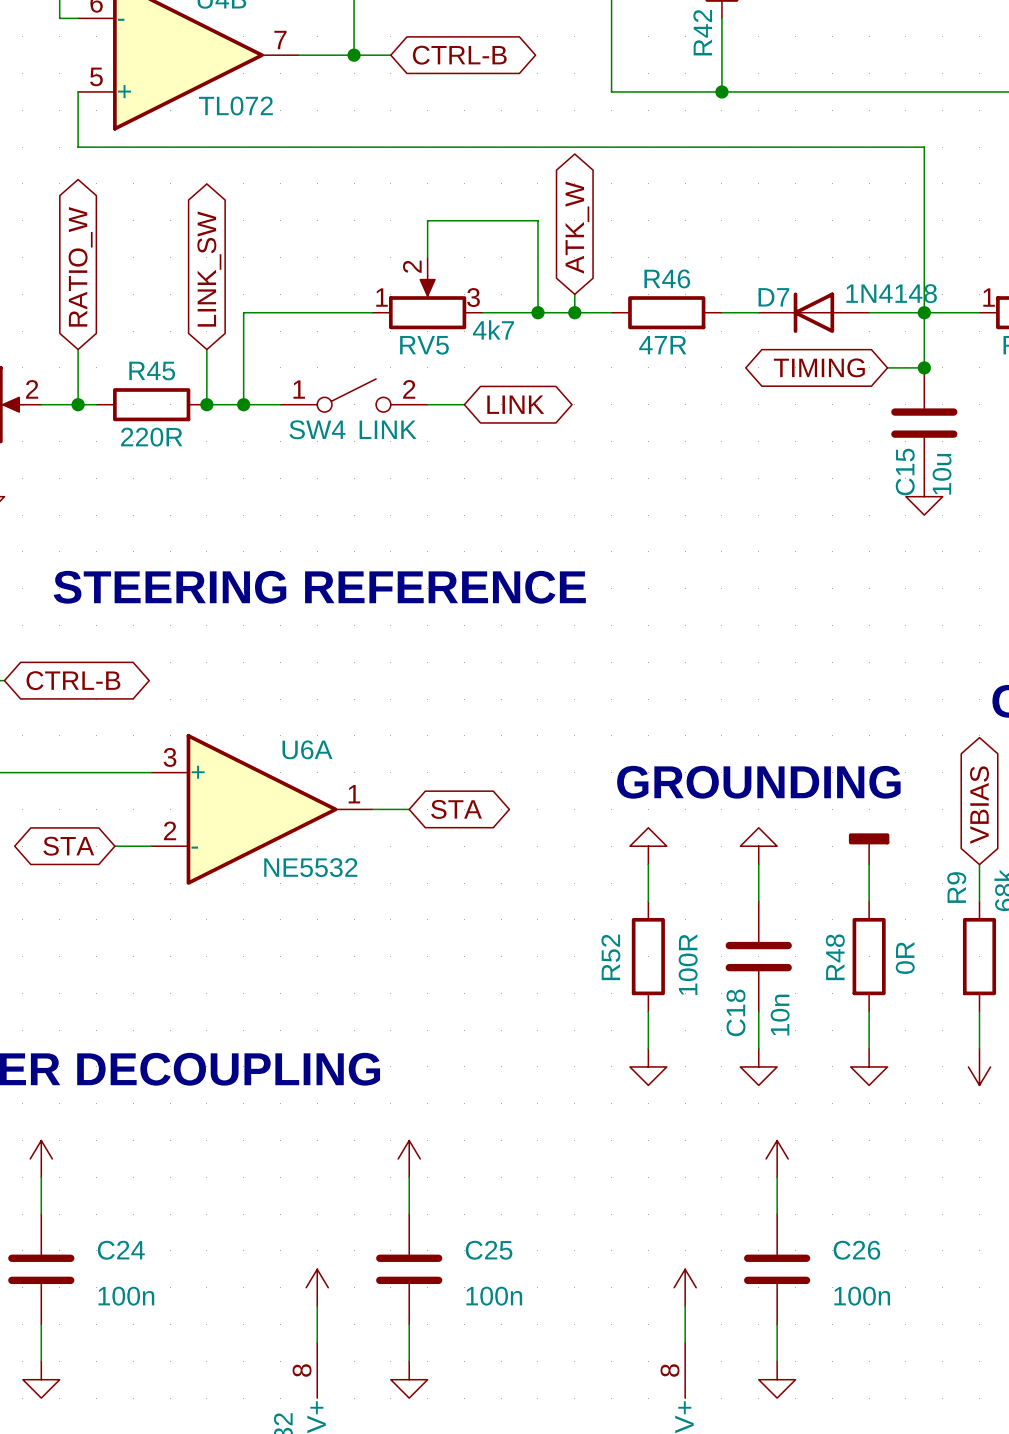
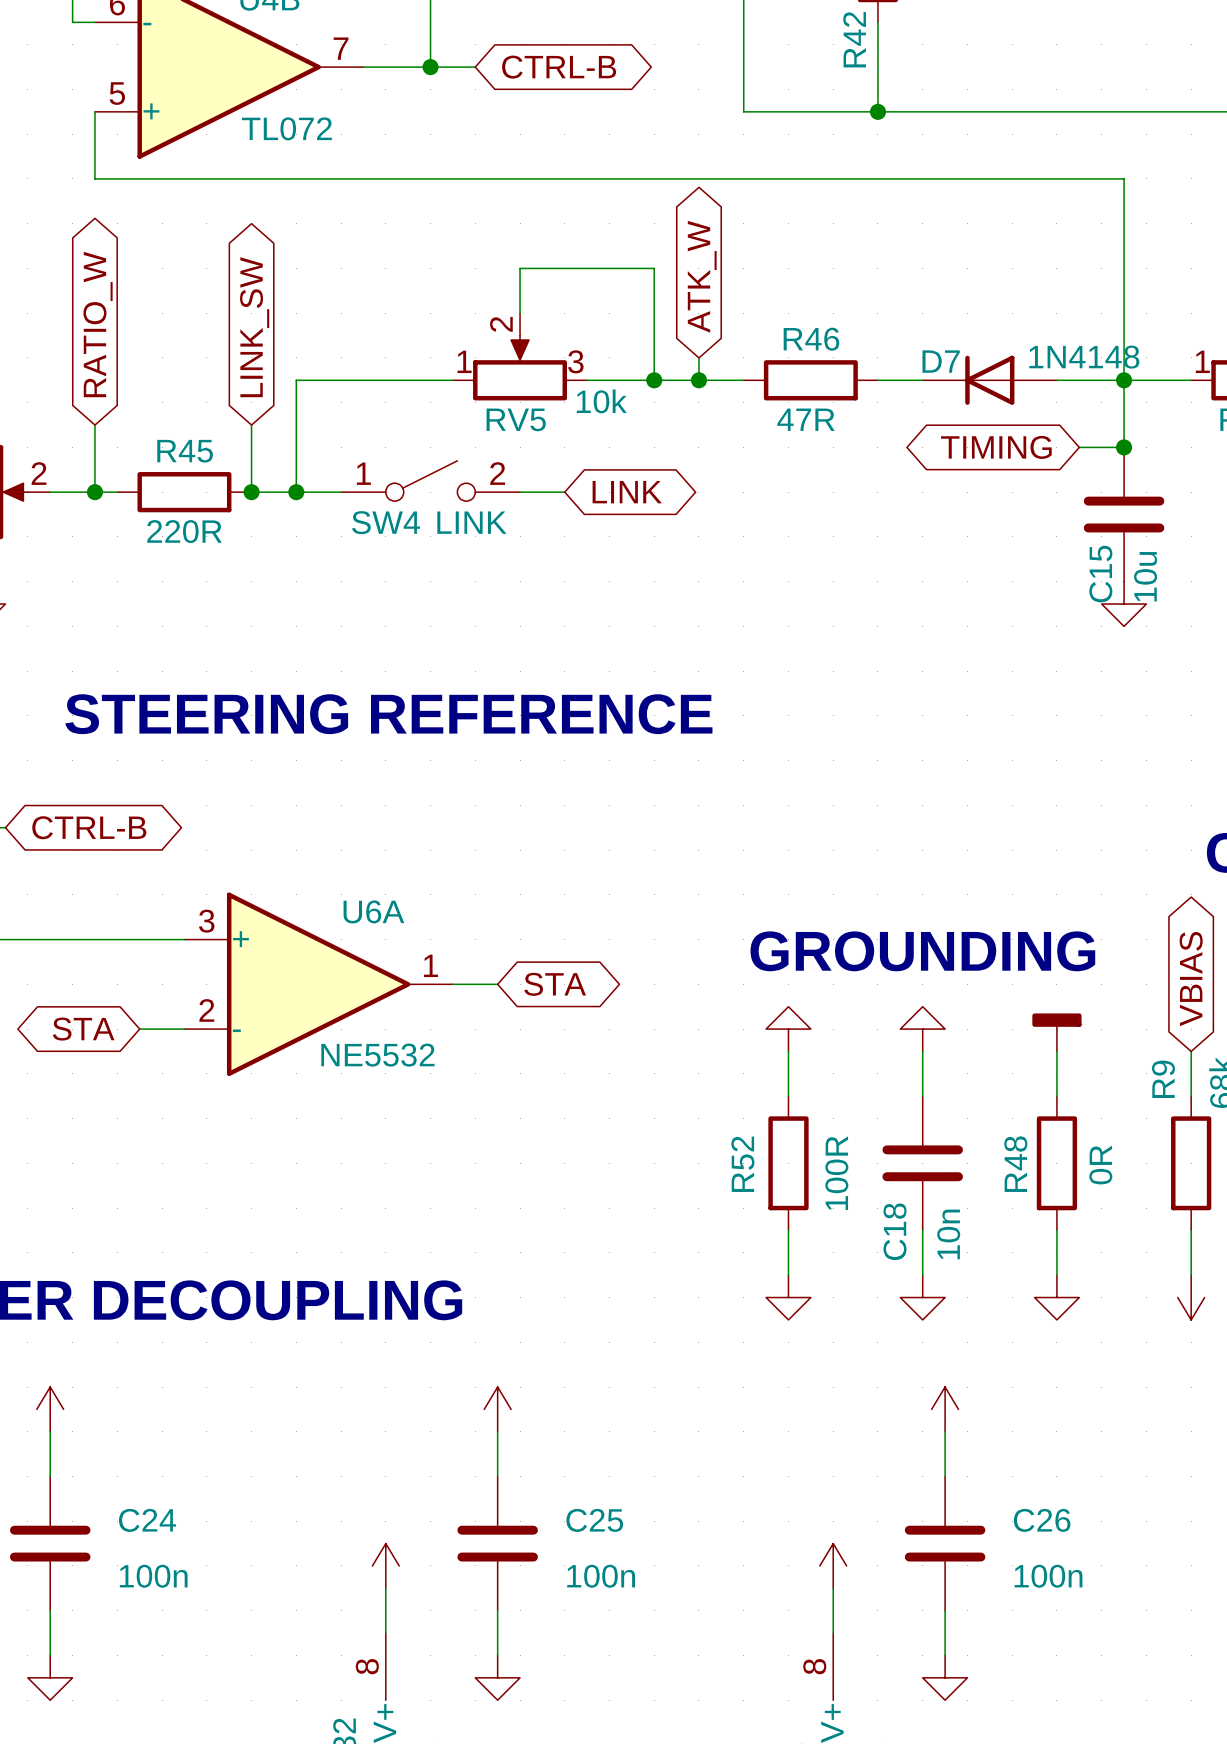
RV5 value: 4k7 (493, 329) -> 10k (601, 401)

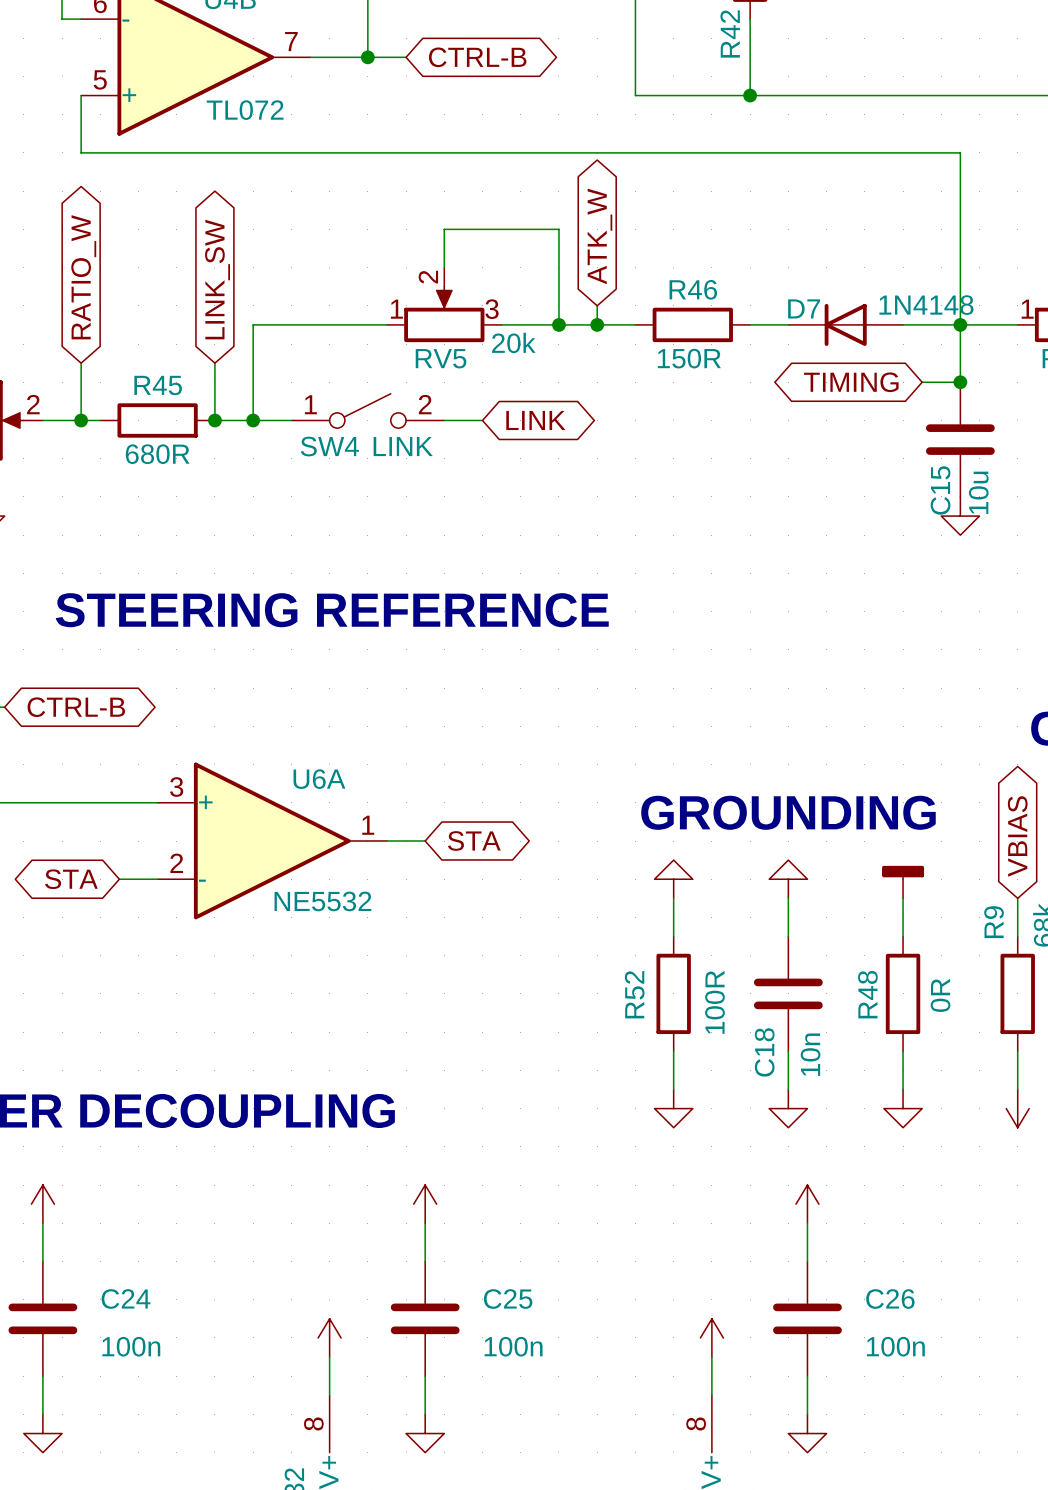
RV5 value: 10k (601, 401) -> 20k (513, 342)
R46 value: 47R (806, 419) -> 150R (689, 358)
R45 value: 220R (184, 531) -> 680R (157, 454)

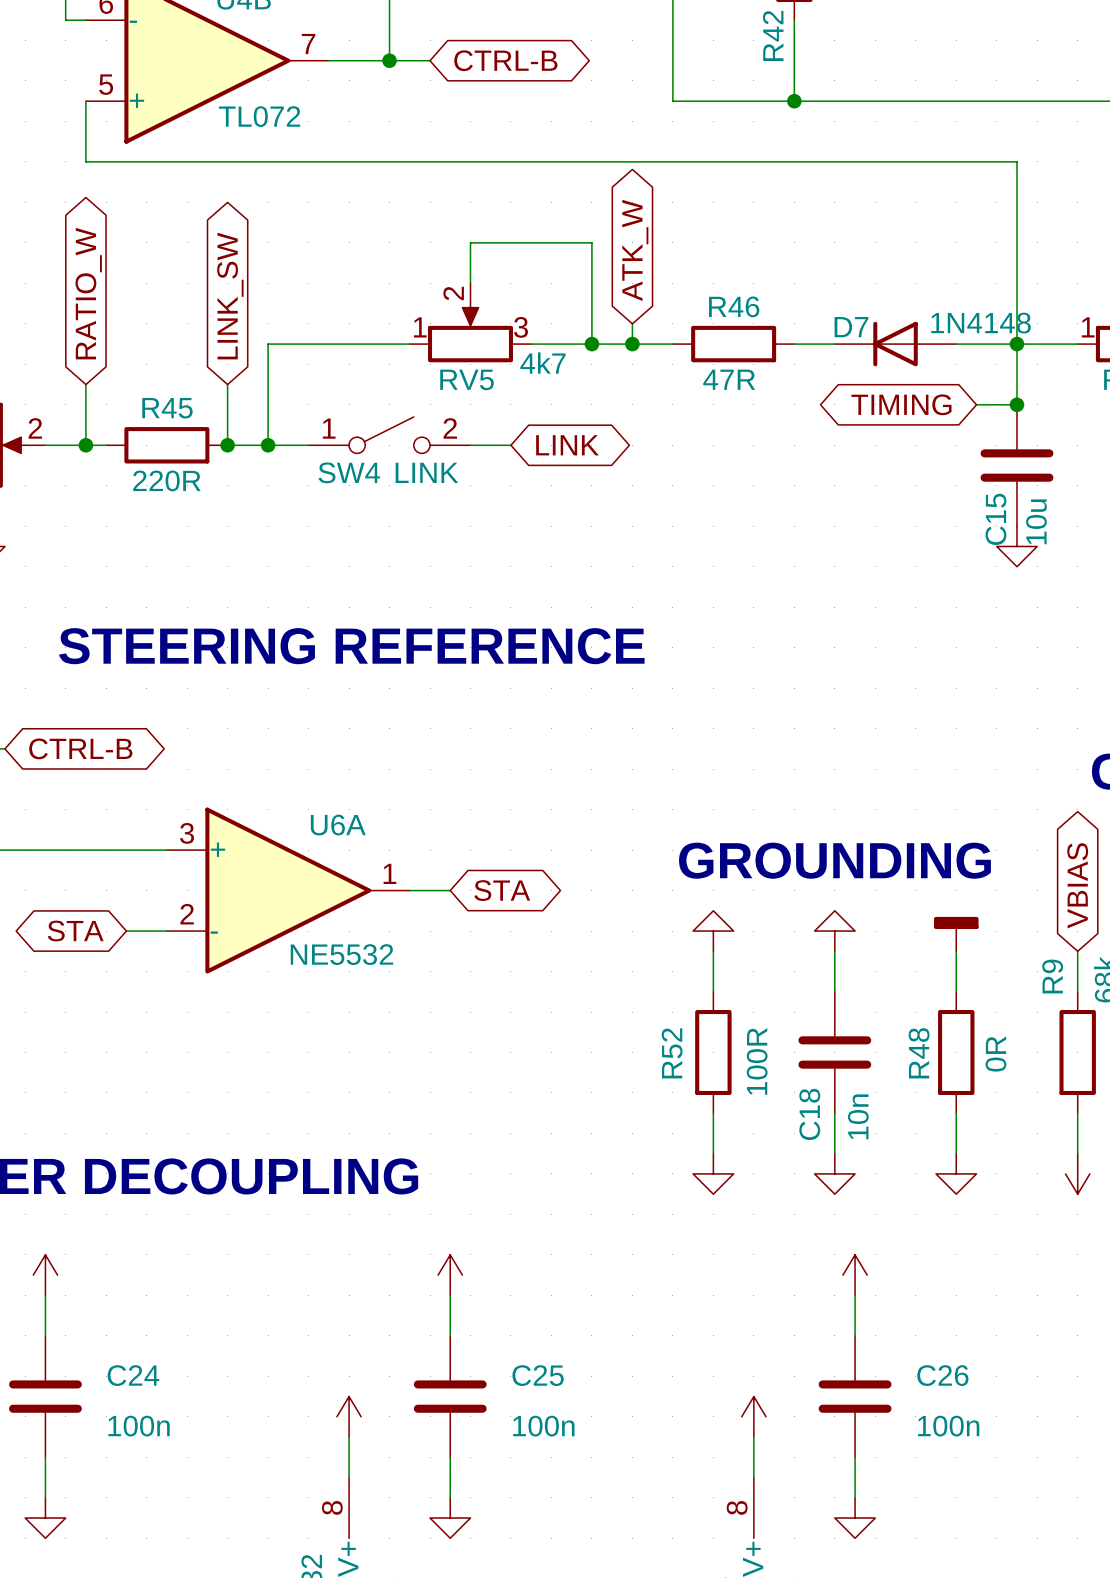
RV5 value: 20k (513, 342) -> 4k7 (542, 363)
R46 value: 150R (689, 358) -> 47R (729, 379)
R45 value: 680R (157, 454) -> 220R (166, 480)

